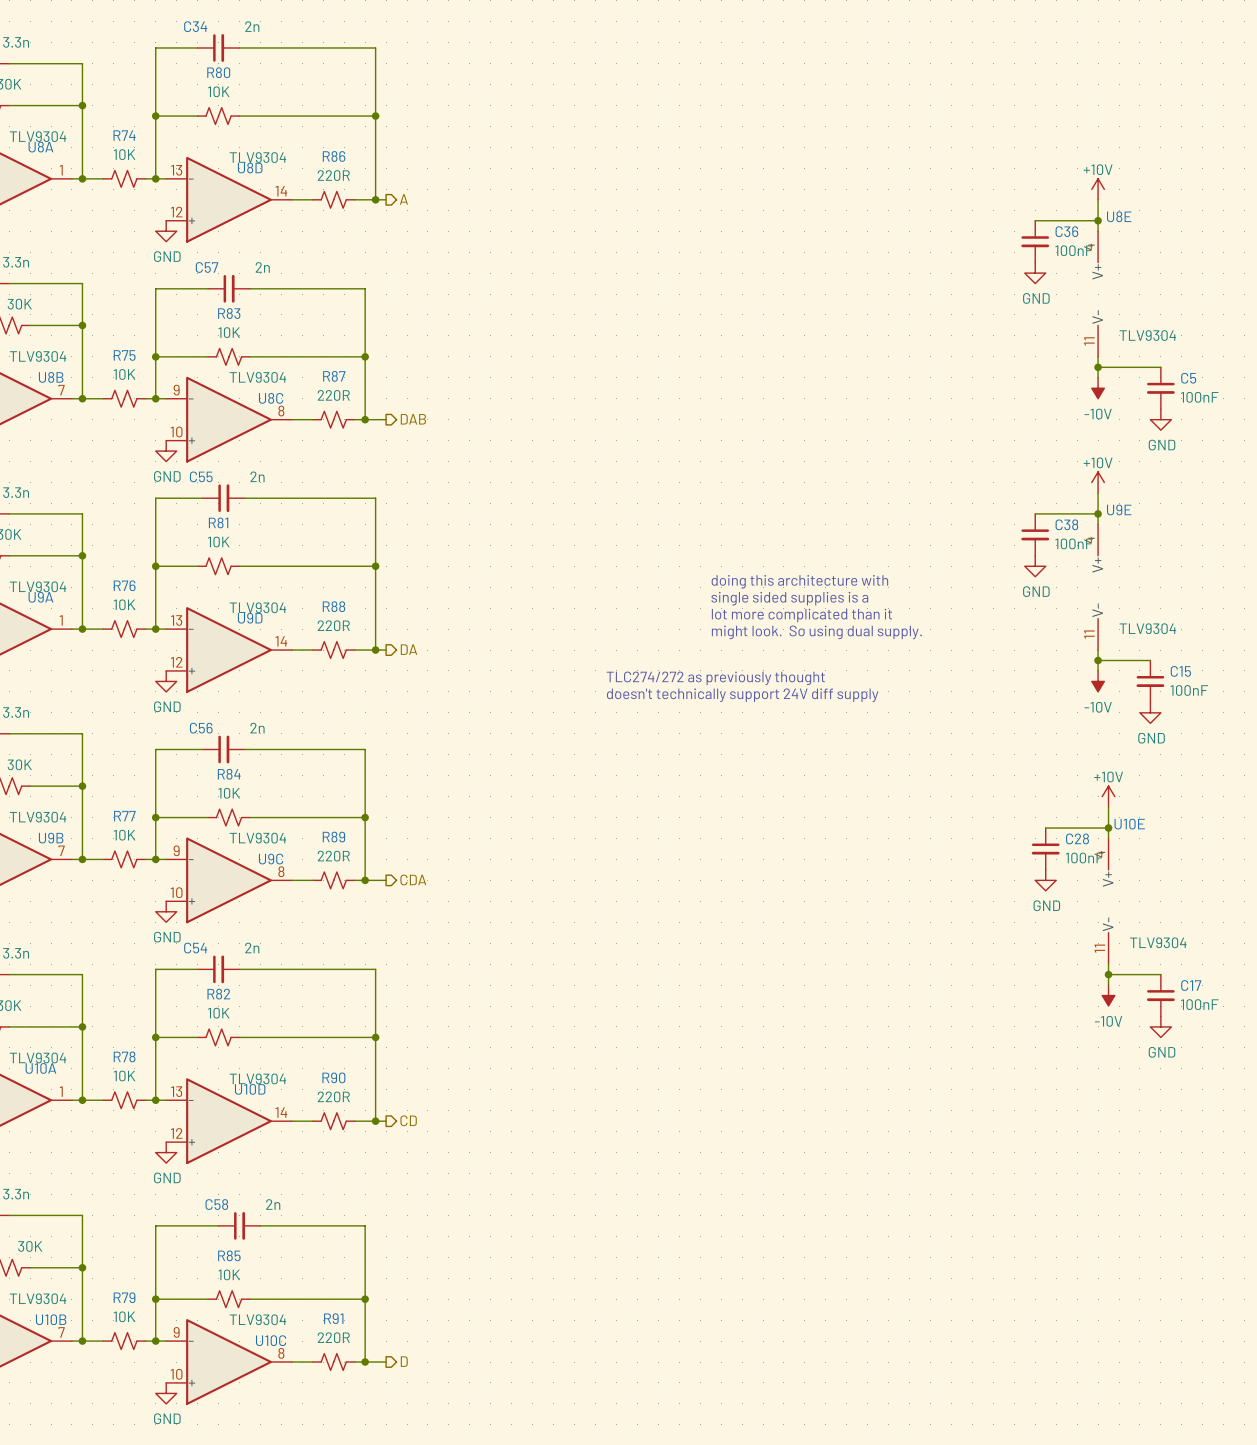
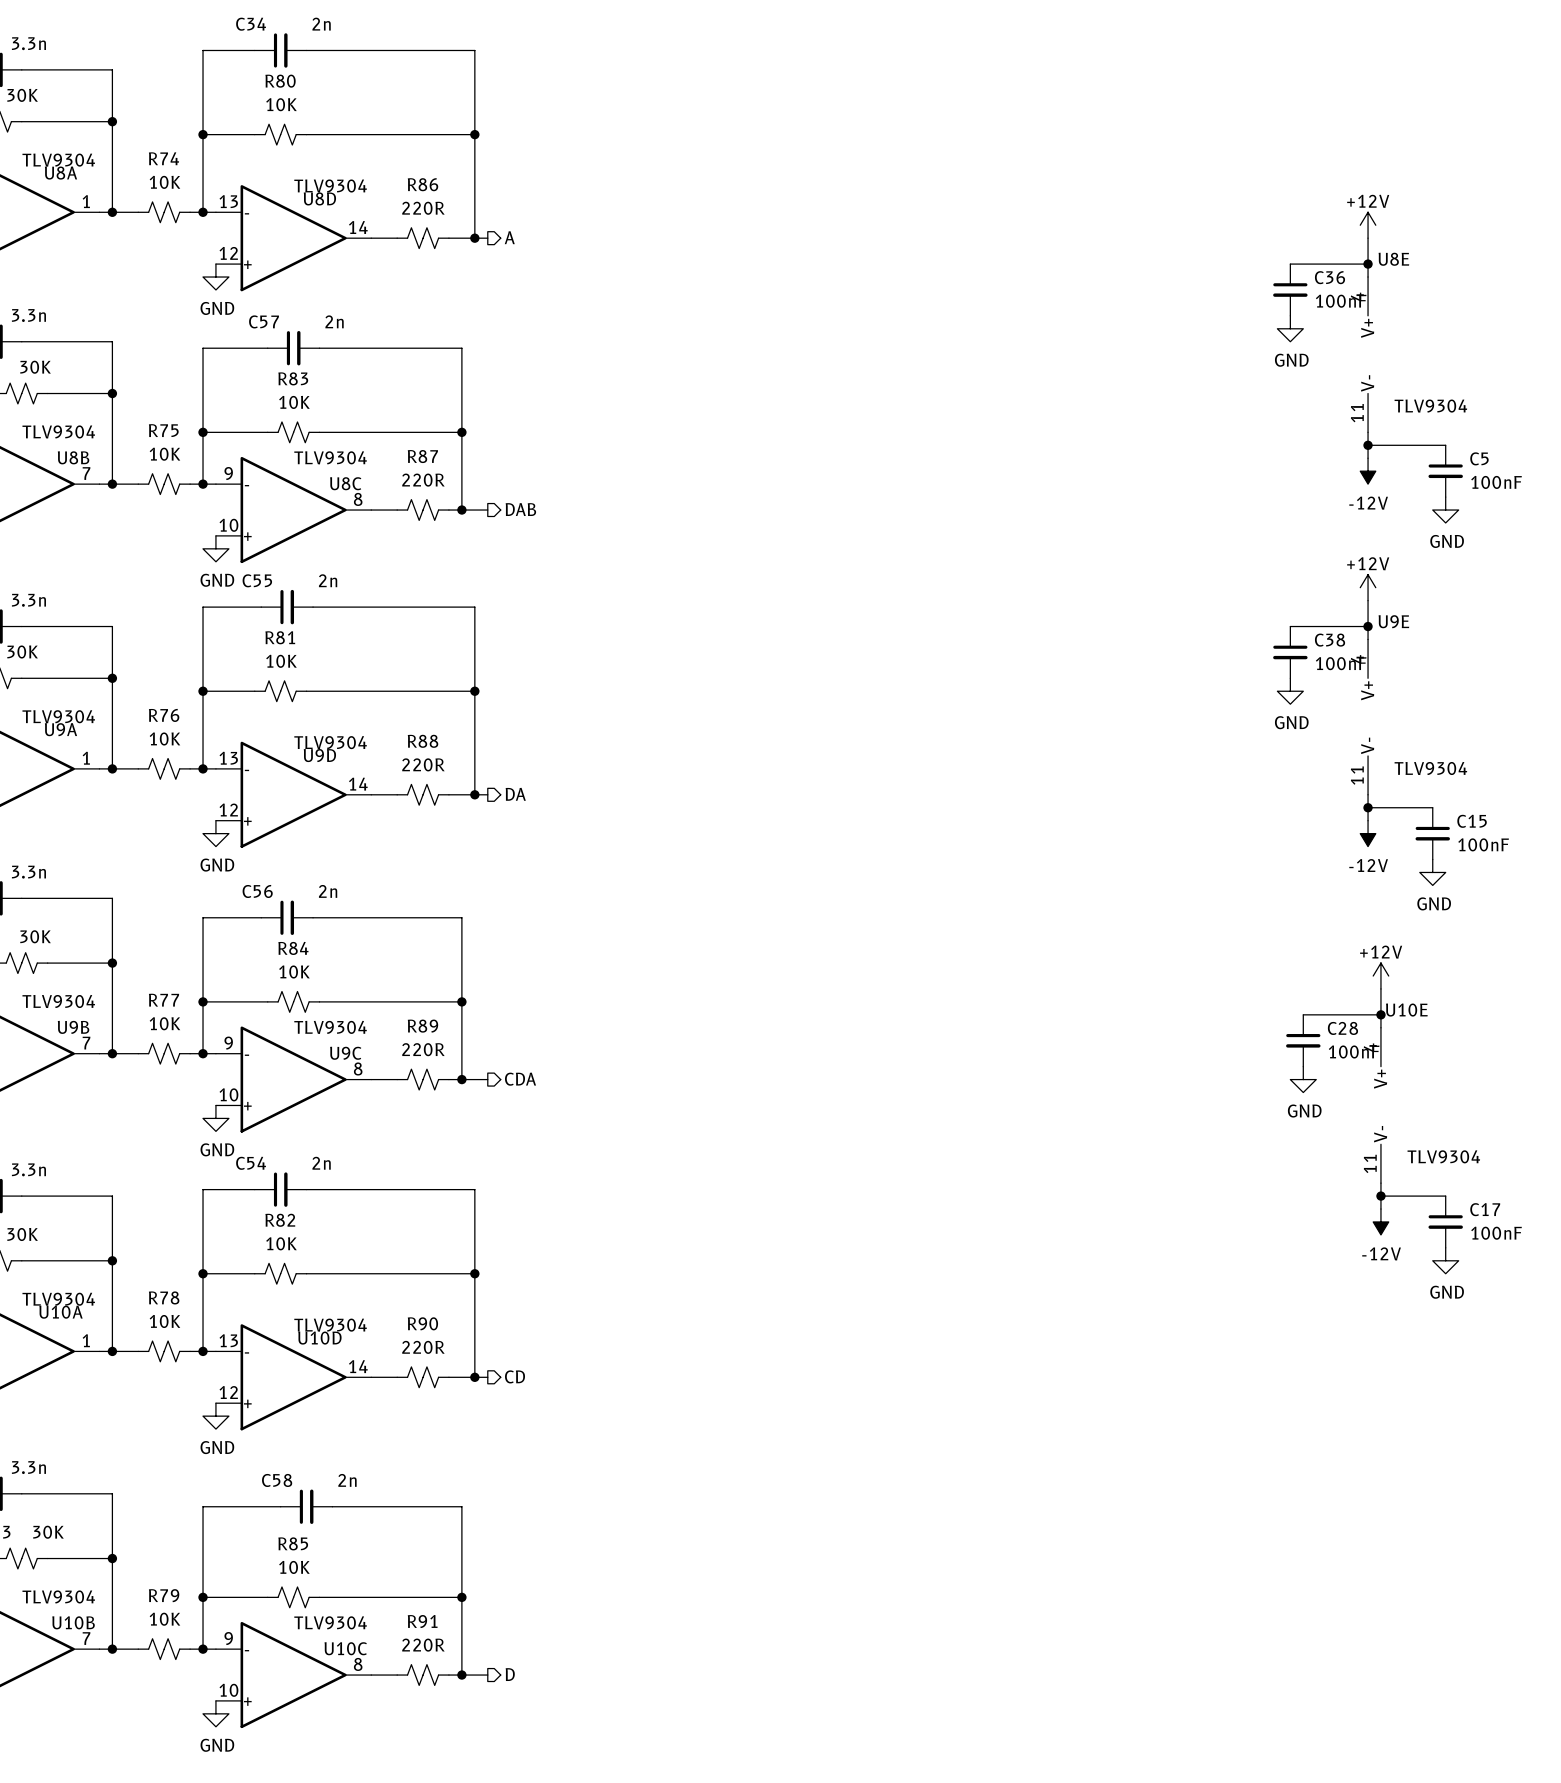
power symbol: +10V (1098, 189) -> +12V (1368, 225)
power symbol: -10V (1098, 388) -> -12V (1368, 471)
power symbol: +10V (1098, 482) -> +12V (1368, 587)
text: doing this architecture with (799, 581) -> none
text: single sided supplies is a (789, 598) -> none
text: lot more complicated than it (801, 615) -> none
text: might look. So using dual supply. (816, 632) -> none
text: TLC274/272 as previously thought (715, 678) -> none
power symbol: -10V (1098, 681) -> -12V (1368, 833)
text: doesn't technically support 24V diff supply (742, 695) -> none
power symbol: +10V (1108, 796) -> +12V (1380, 976)
power symbol: -10V (1108, 995) -> -12V (1380, 1221)

